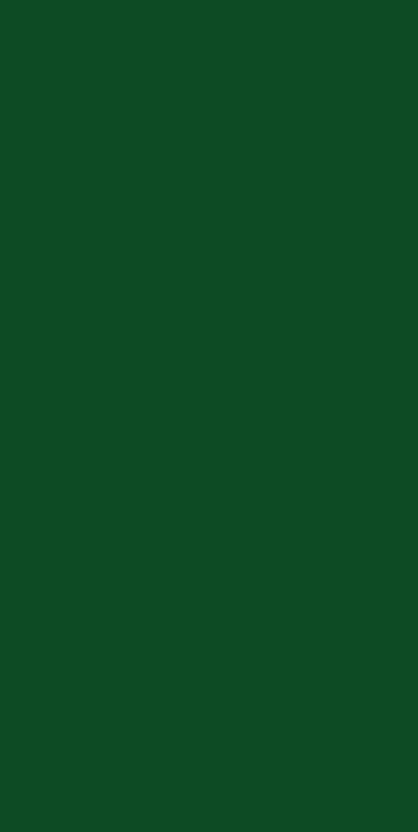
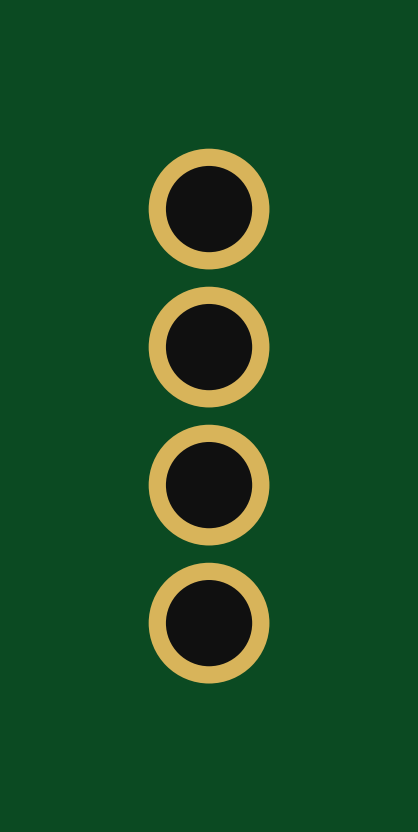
part: none -> (209, 209)
part: none -> (209, 347)
part: none -> (209, 485)
part: none -> (209, 623)

